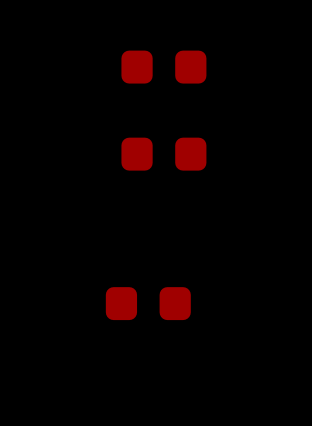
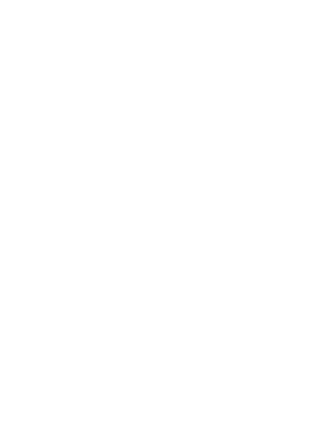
part: (163, 67) -> none
part: (163, 154) -> none
part: (148, 303) -> none

